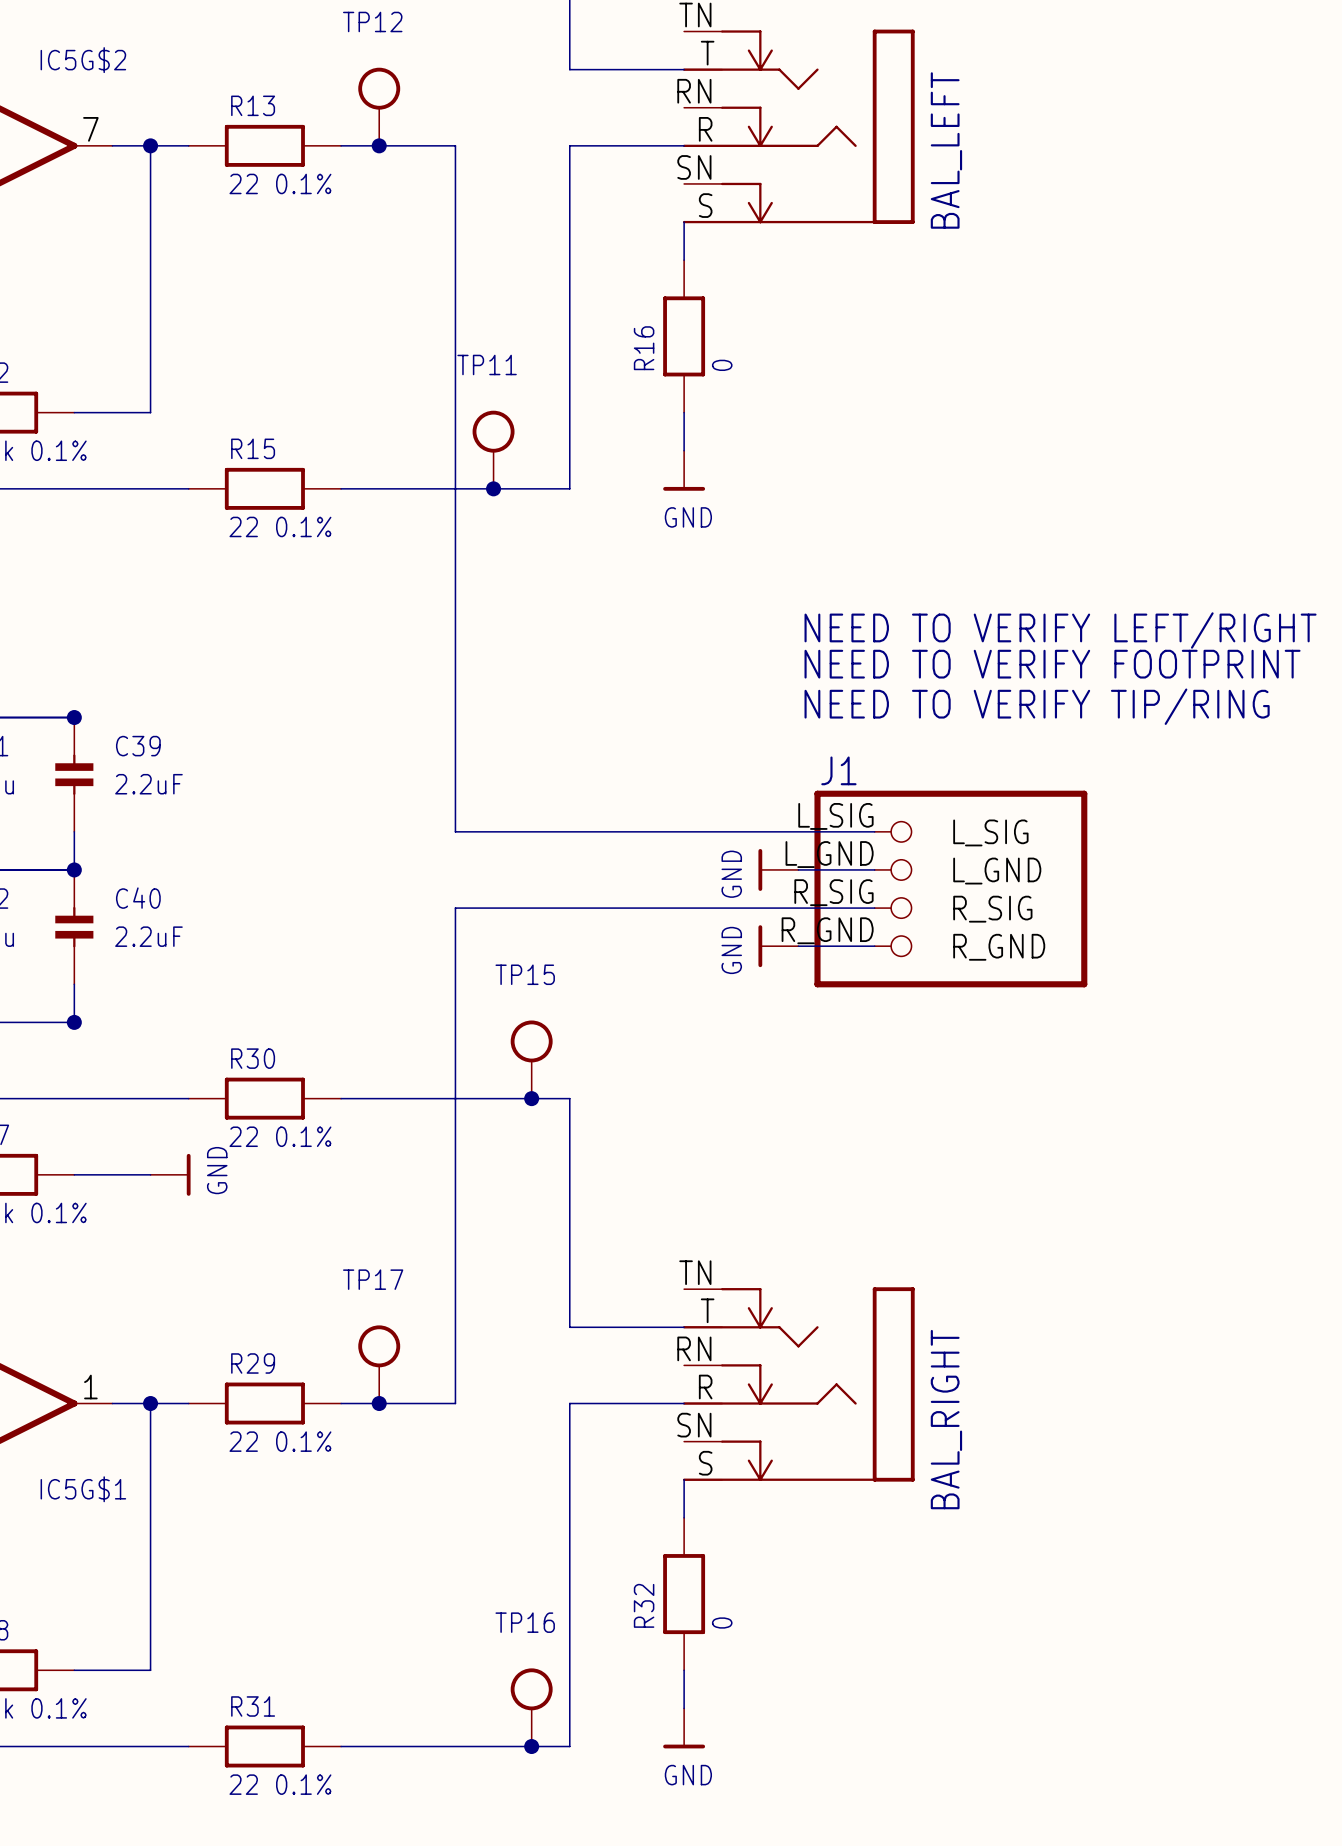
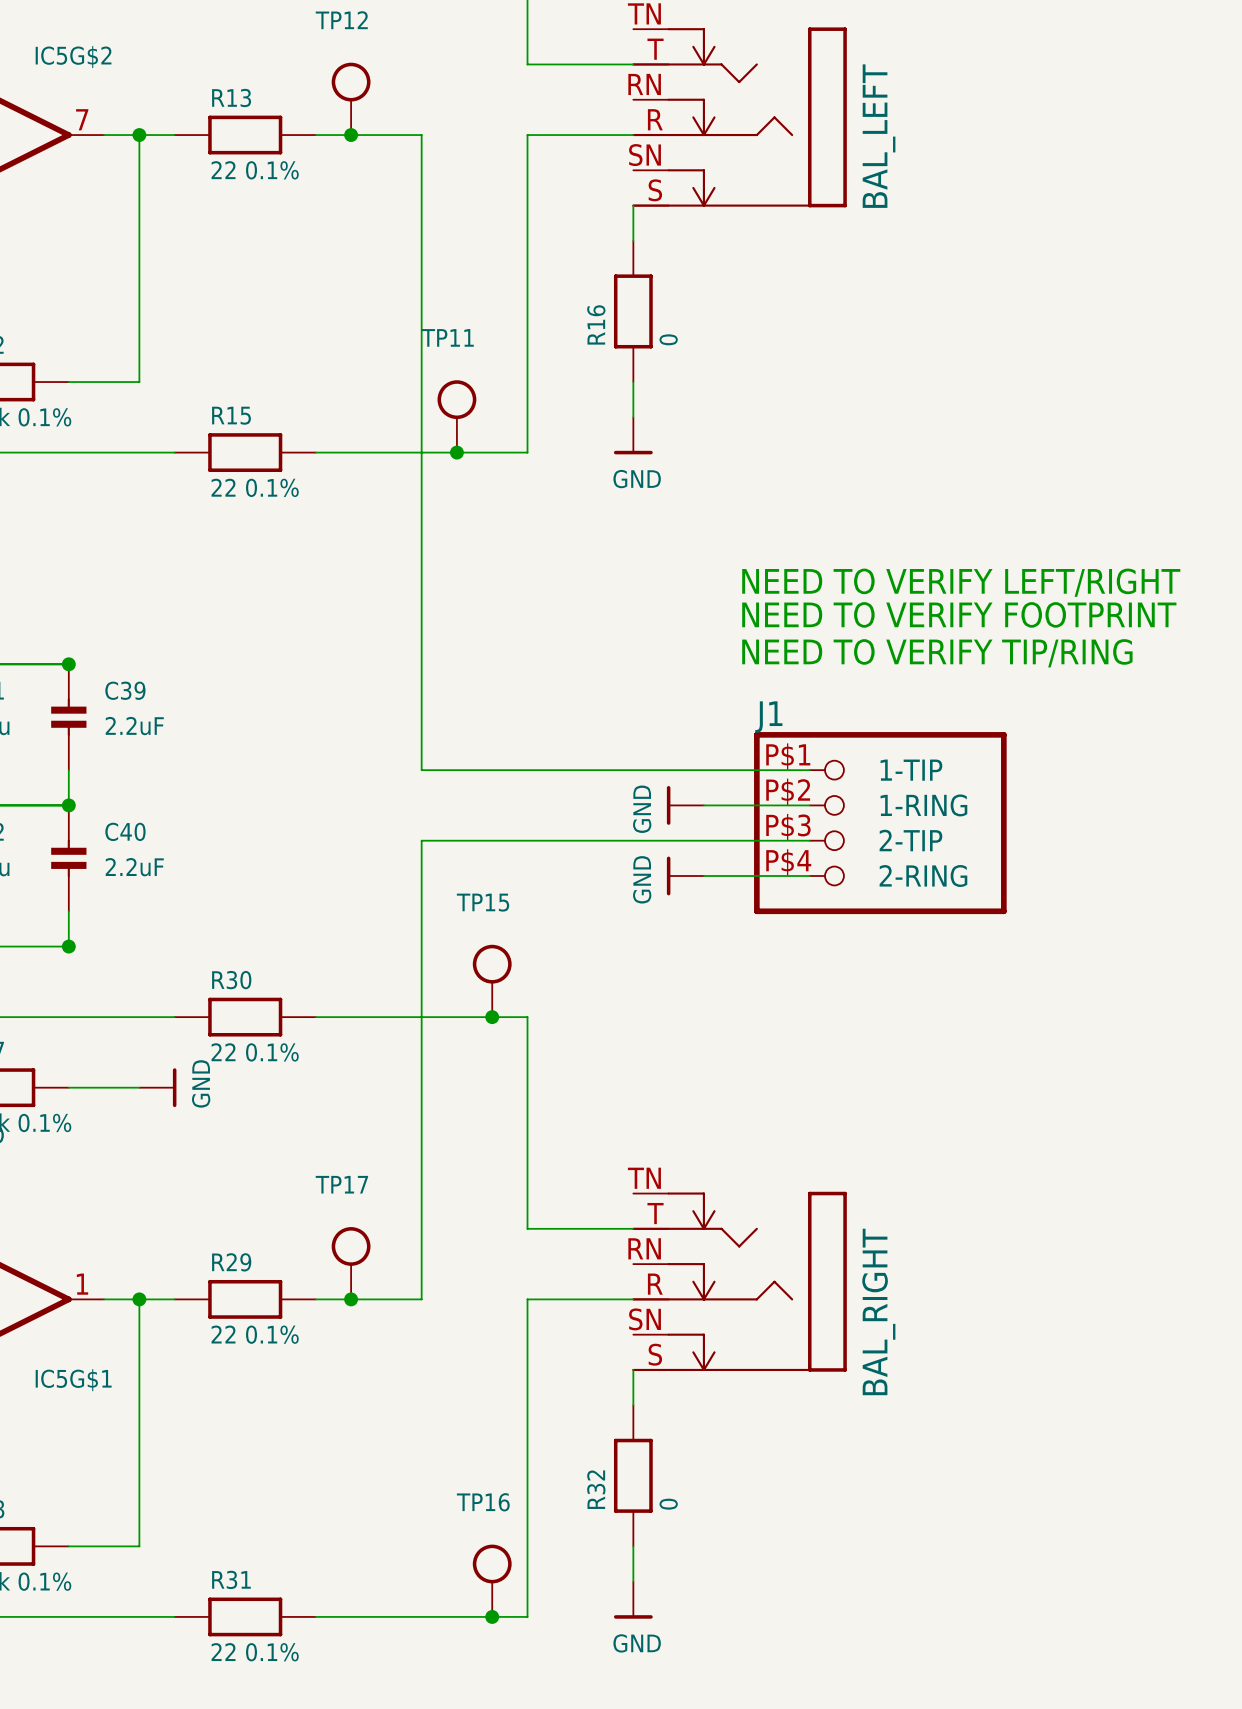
J1 pin number: L_SIG (835, 816) -> P$1 (788, 756)
J1 pin name: L_SIG (990, 832) -> 1-TIP (911, 770)
J1 pin number: L_GND (829, 854) -> P$2 (788, 791)
power symbol position: GND (778, 869) -> GND (685, 805)
J1 pin name: L_GND (997, 871) -> 1-RING (923, 805)
J1 pin number: R_SIG (833, 892) -> P$3 (788, 827)
J1 pin name: R_SIG (992, 909) -> 2-TIP (910, 840)
J1 pin number: R_GND (827, 930) -> P$4 (788, 862)
power symbol position: GND (778, 946) -> GND (685, 875)
J1 pin name: R_GND (999, 947) -> 2-RING (923, 876)

